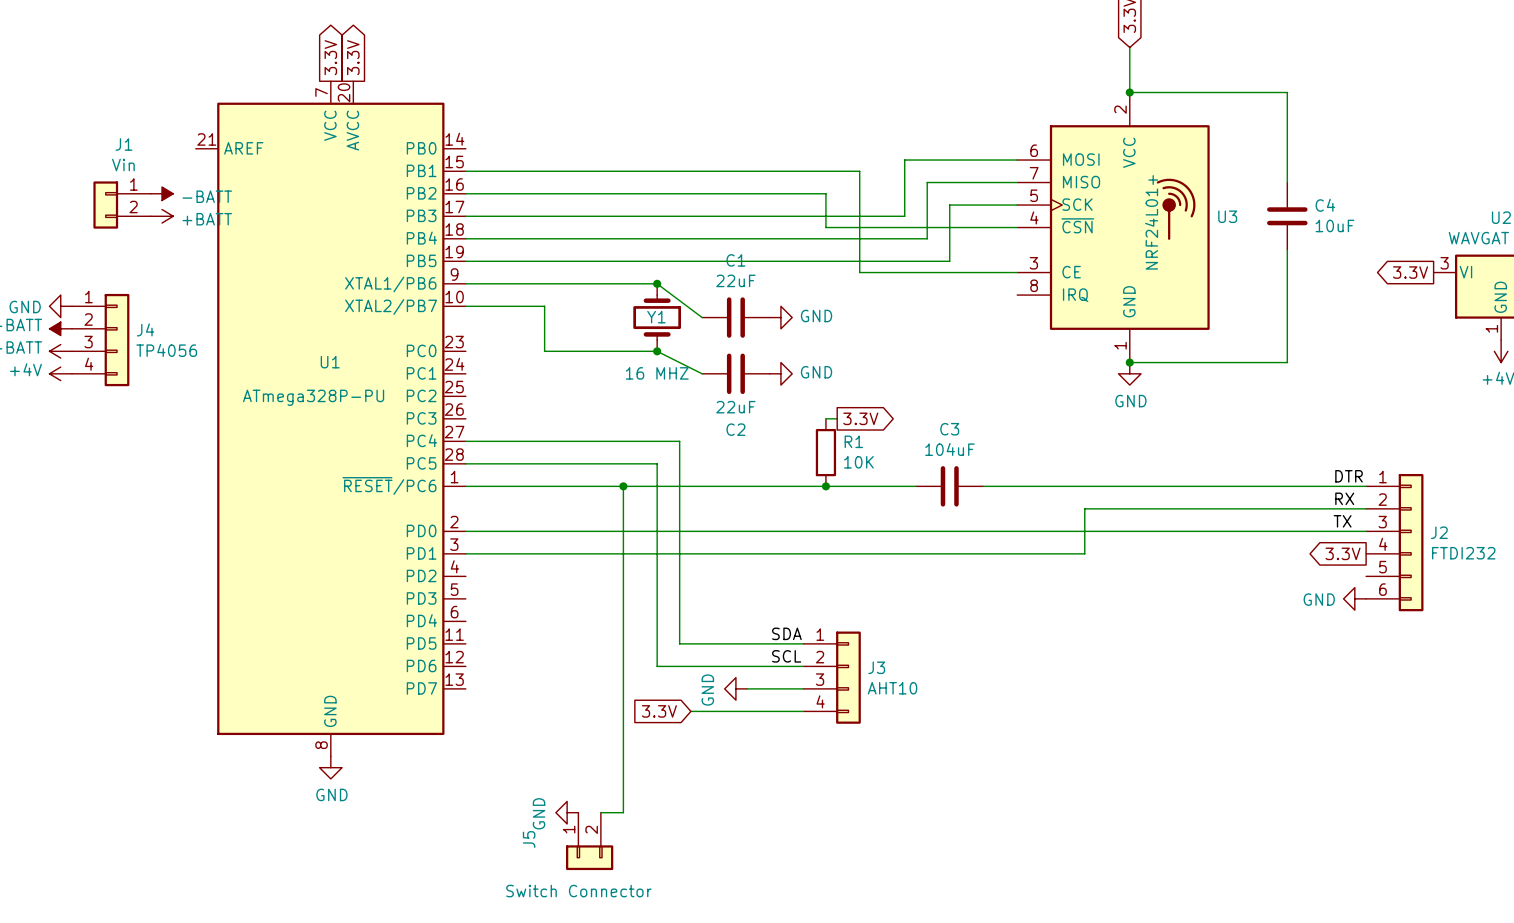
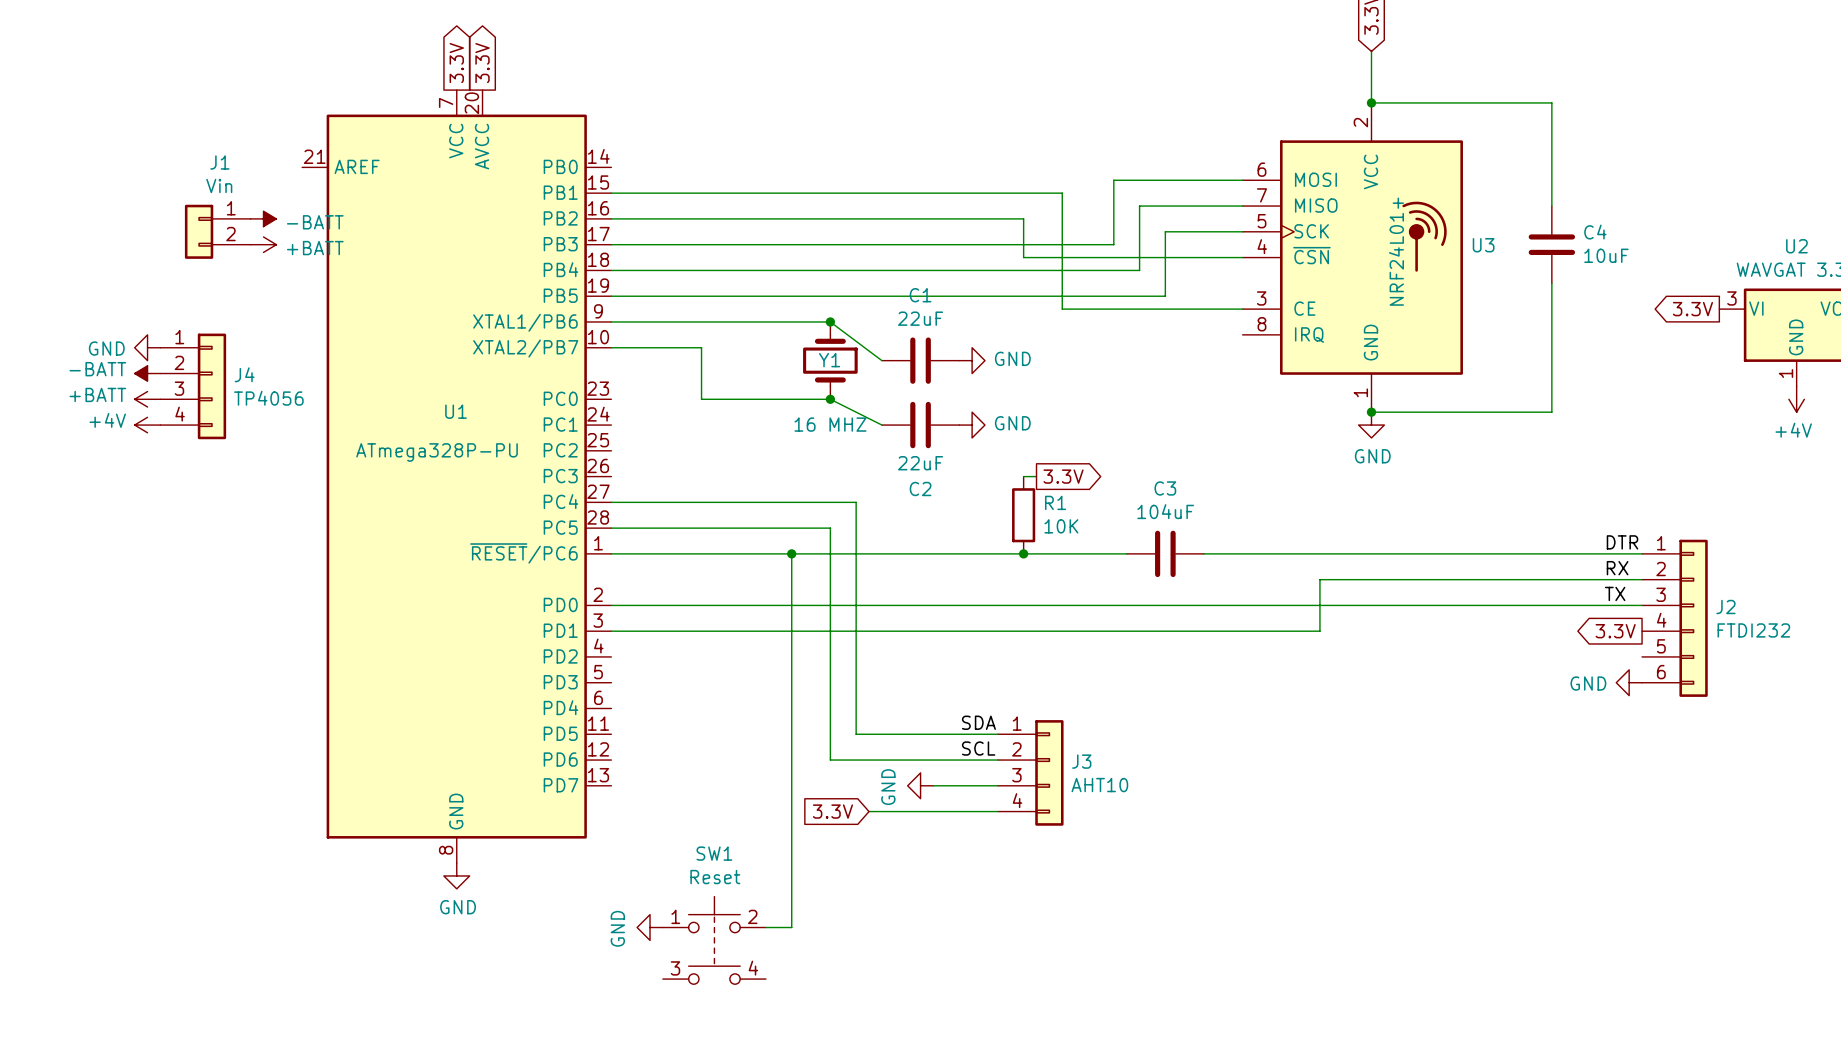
power symbol position: GND (567, 812) -> GND (650, 927)
SW1: none -> Reset (714, 940)
J5: Switch Connector (589, 841) -> none

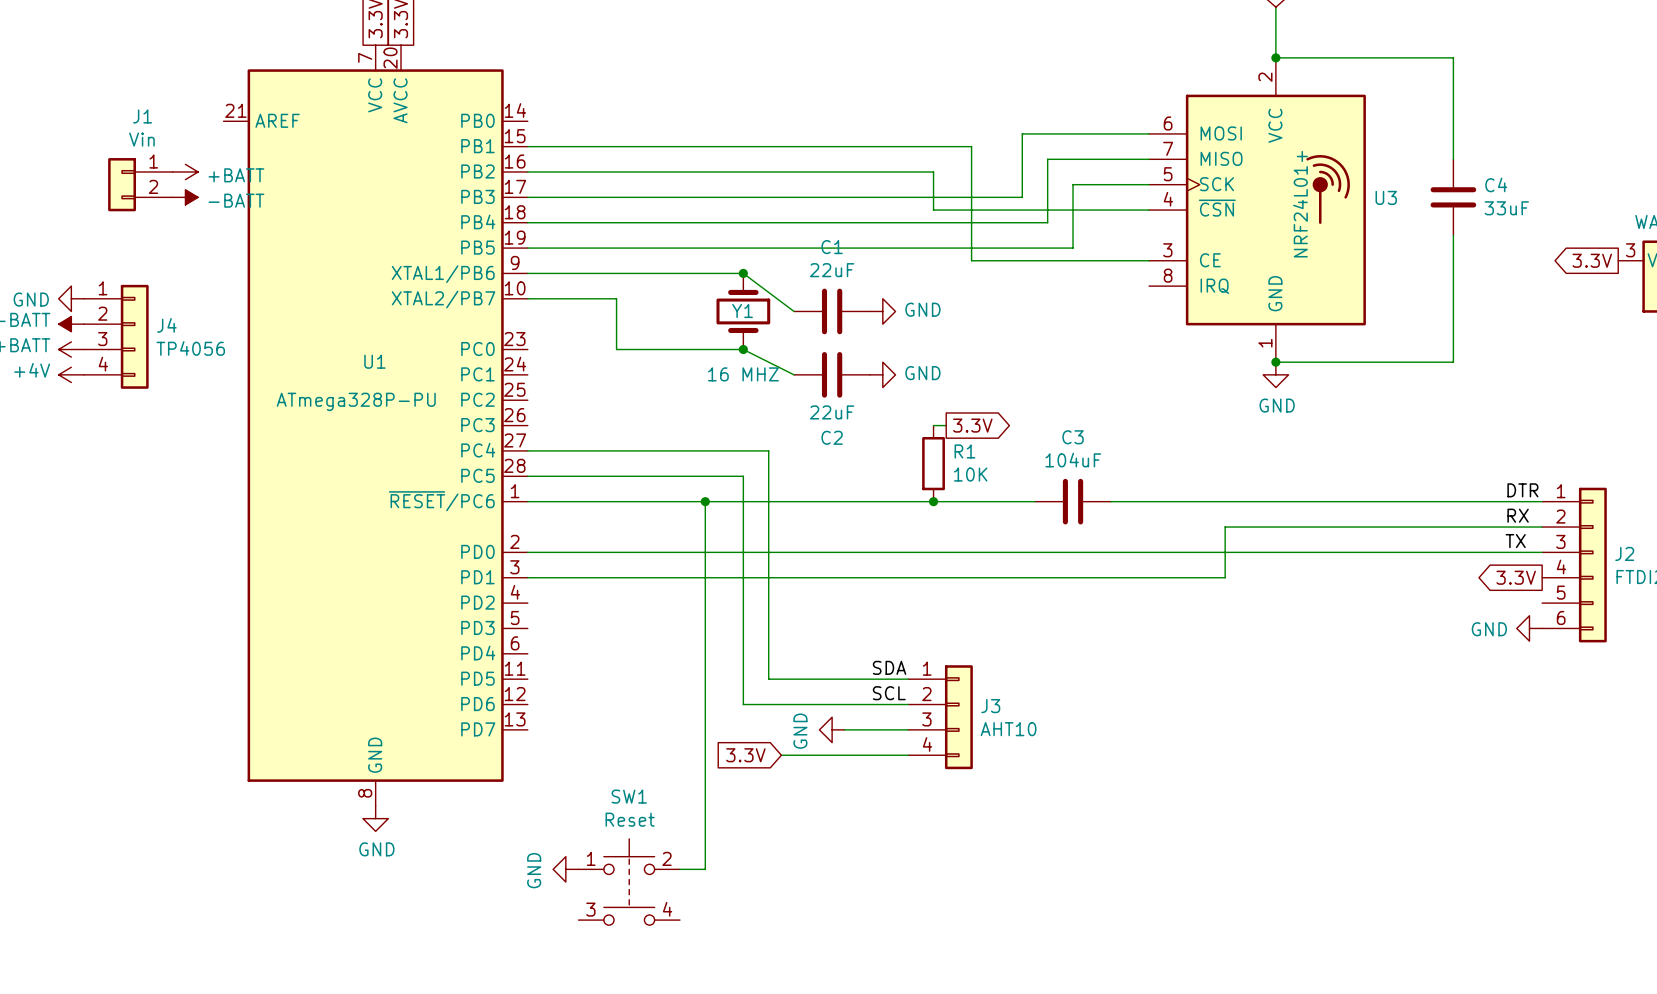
power symbol: -BATT (263, 218) -> +BATT (185, 171)
power symbol: +BATT (263, 244) -> -BATT (185, 197)
C4 value: 10uF (1606, 255) -> 33uF (1506, 208)

